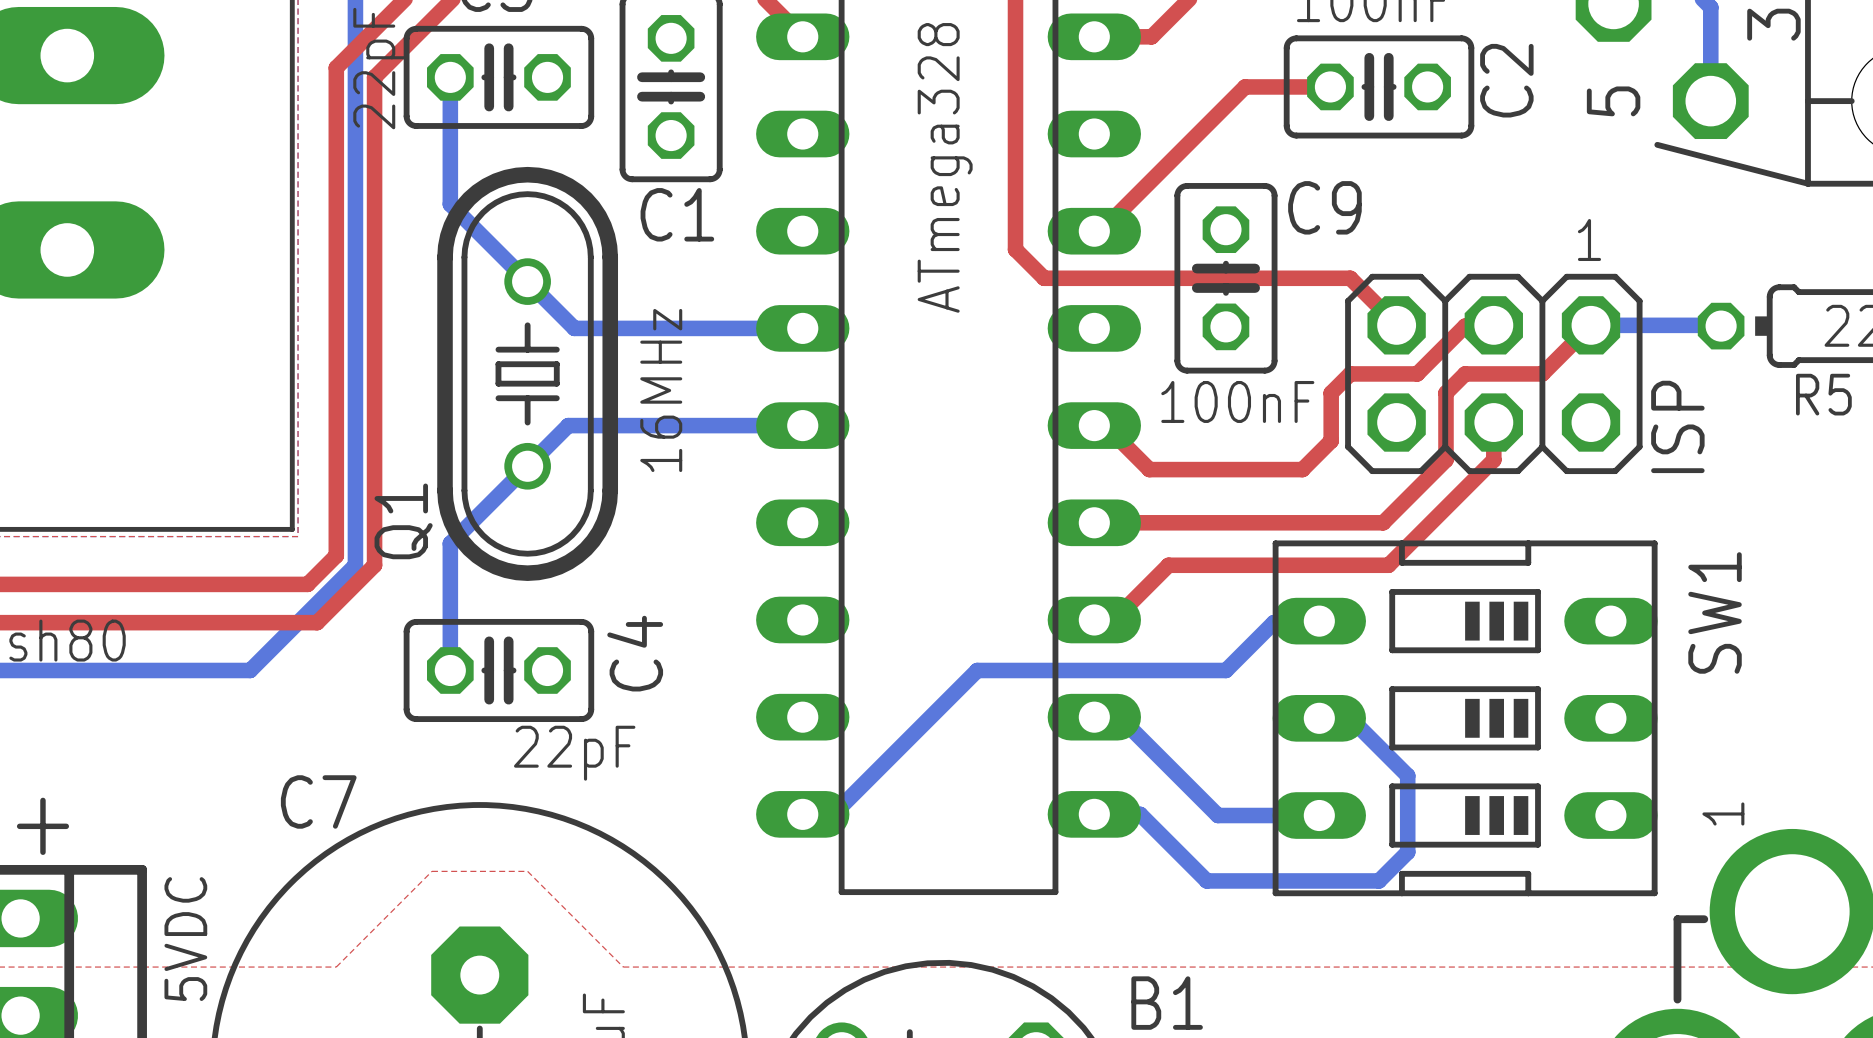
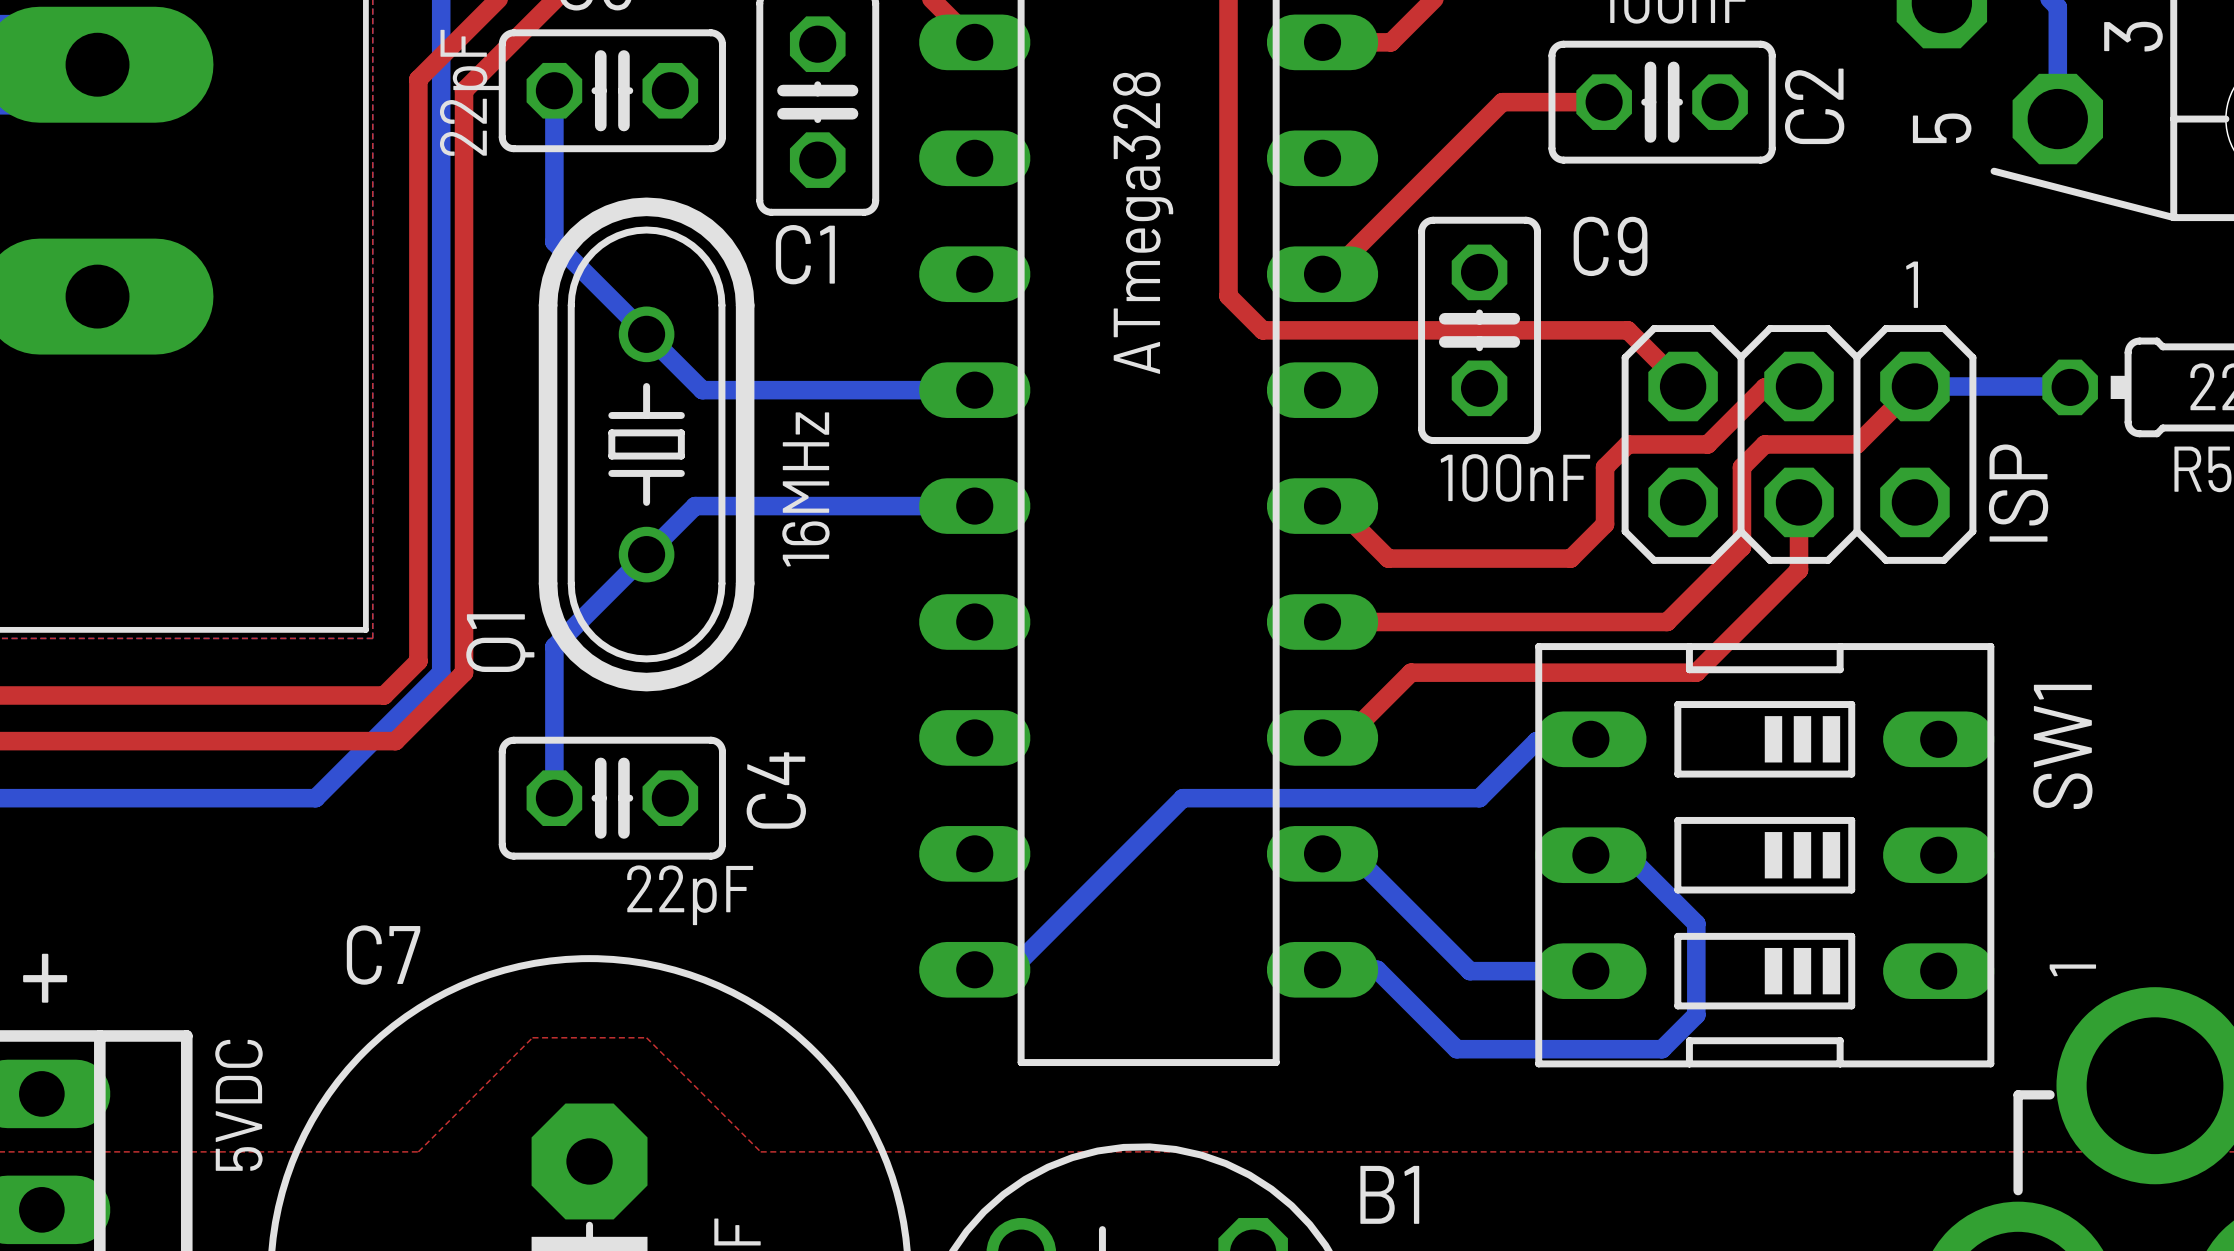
top track: (1493, 460) (1388, 565) -> (1799, 547) (1799, 569) (1696, 672) (1673, 672)

